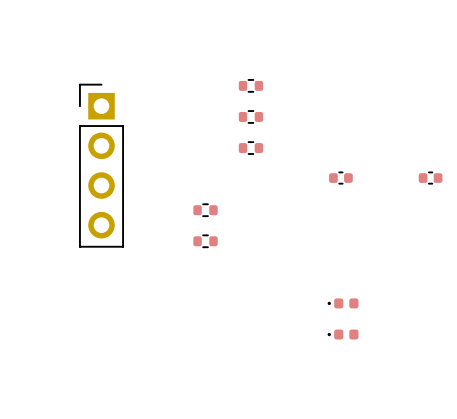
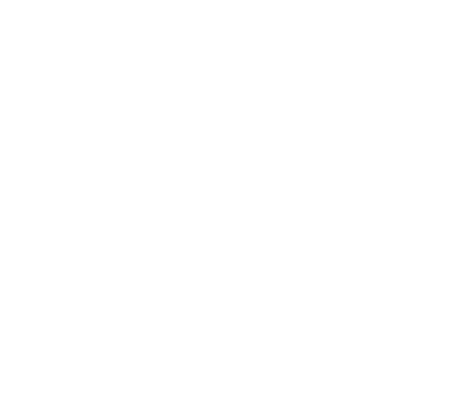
part: (250, 85) -> none
part: (250, 116) -> none
part: (250, 148) -> none
part: (101, 165) -> none
part: (340, 178) -> none
part: (430, 178) -> none
part: (205, 210) -> none
part: (205, 241) -> none
part: (343, 303) -> none
part: (343, 334) -> none

